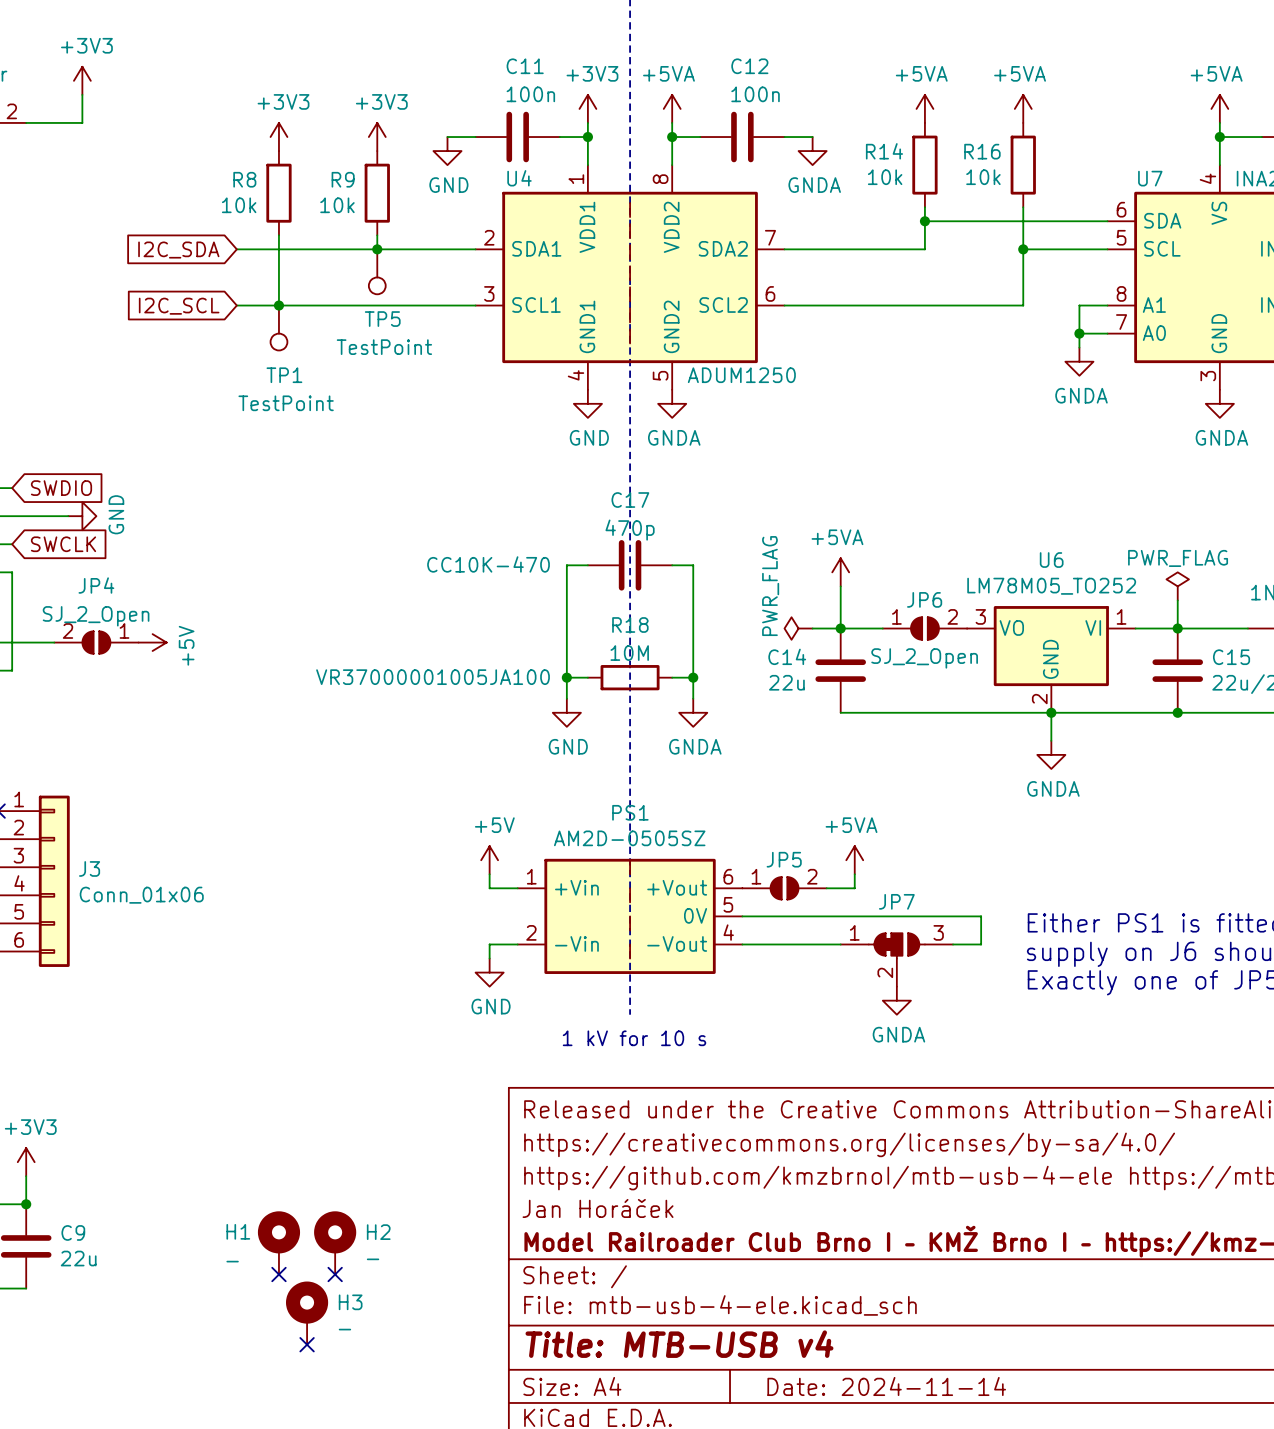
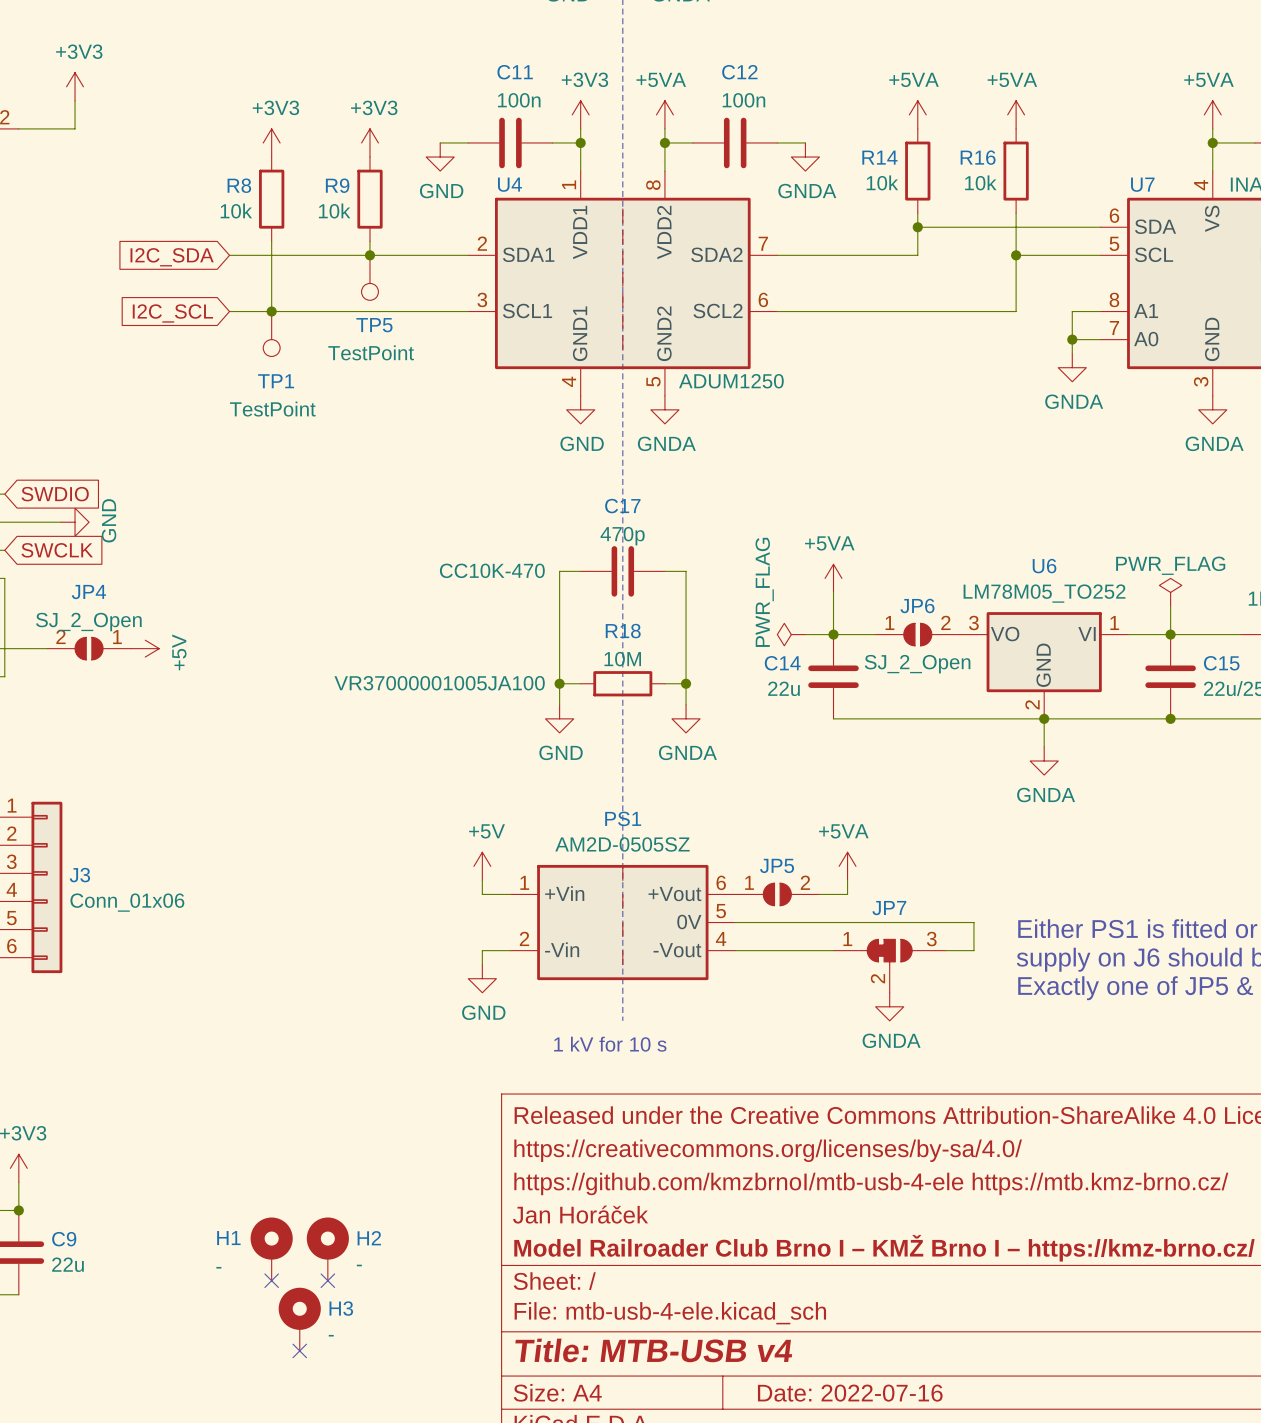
title block: Date: 2024-11-14 (886, 1386) -> Date: 2022-07-16 (850, 1393)

